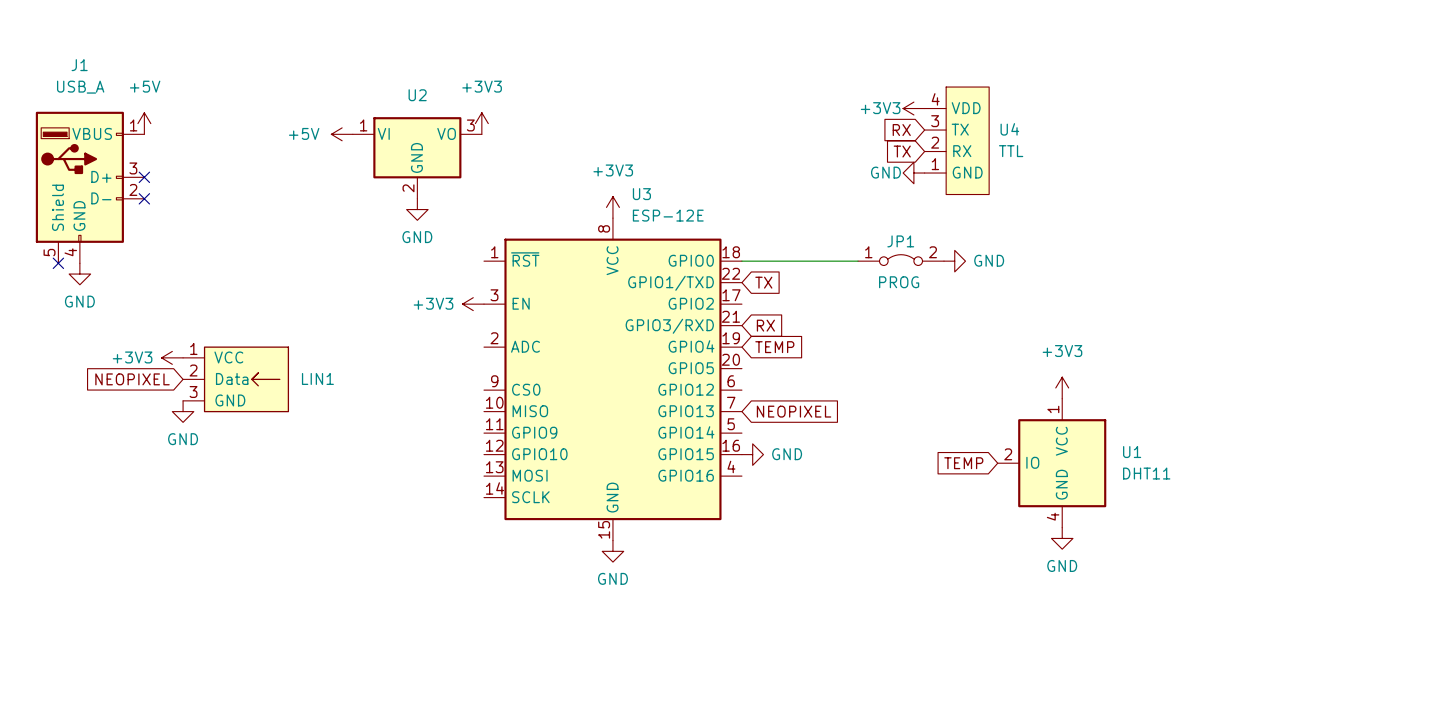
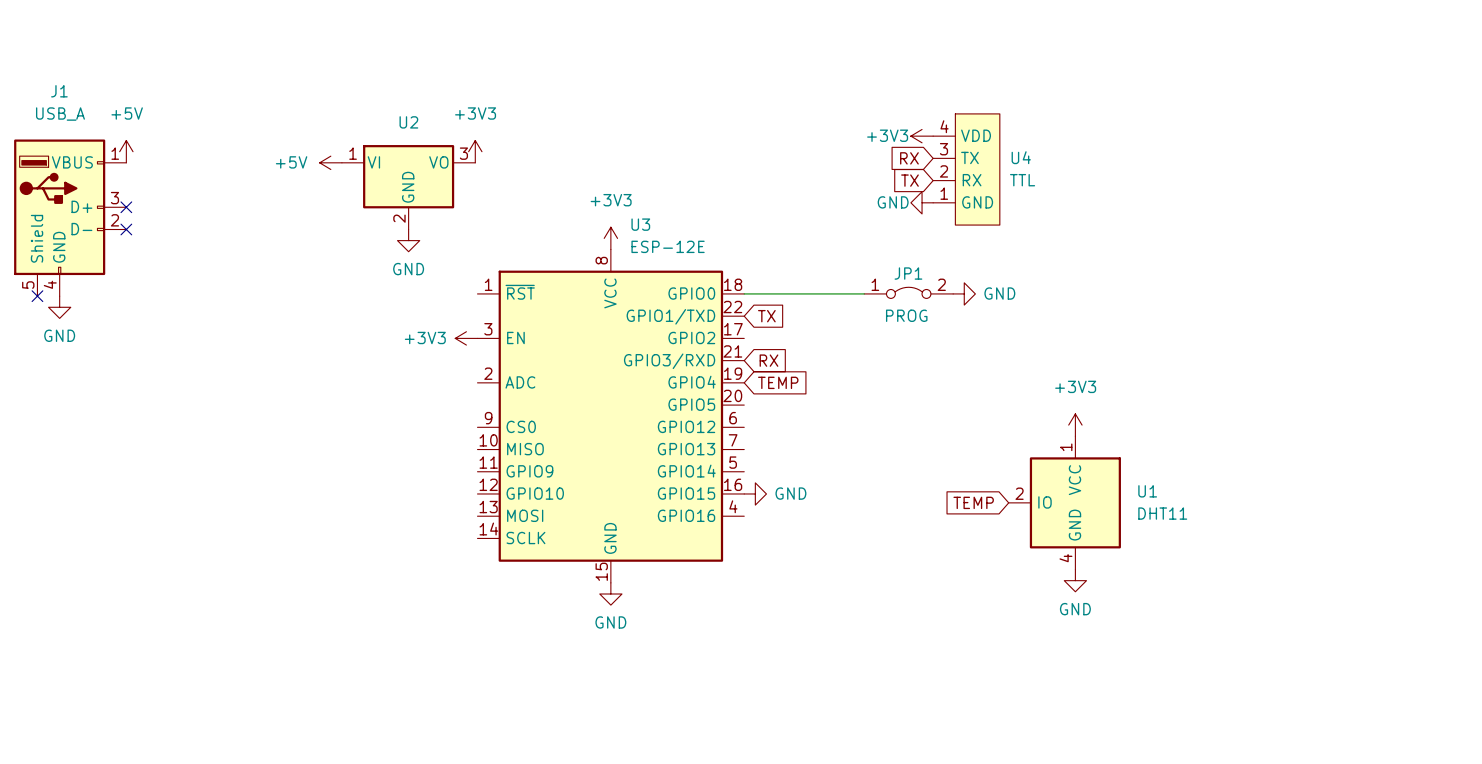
power symbol: +3V3 (172, 357) -> none
global label: NEOPIXEL (132, 379) -> none
LIN1: (236, 379) -> none
power symbol: GND (183, 411) -> none
global label: NEOPIXEL (794, 411) -> none

